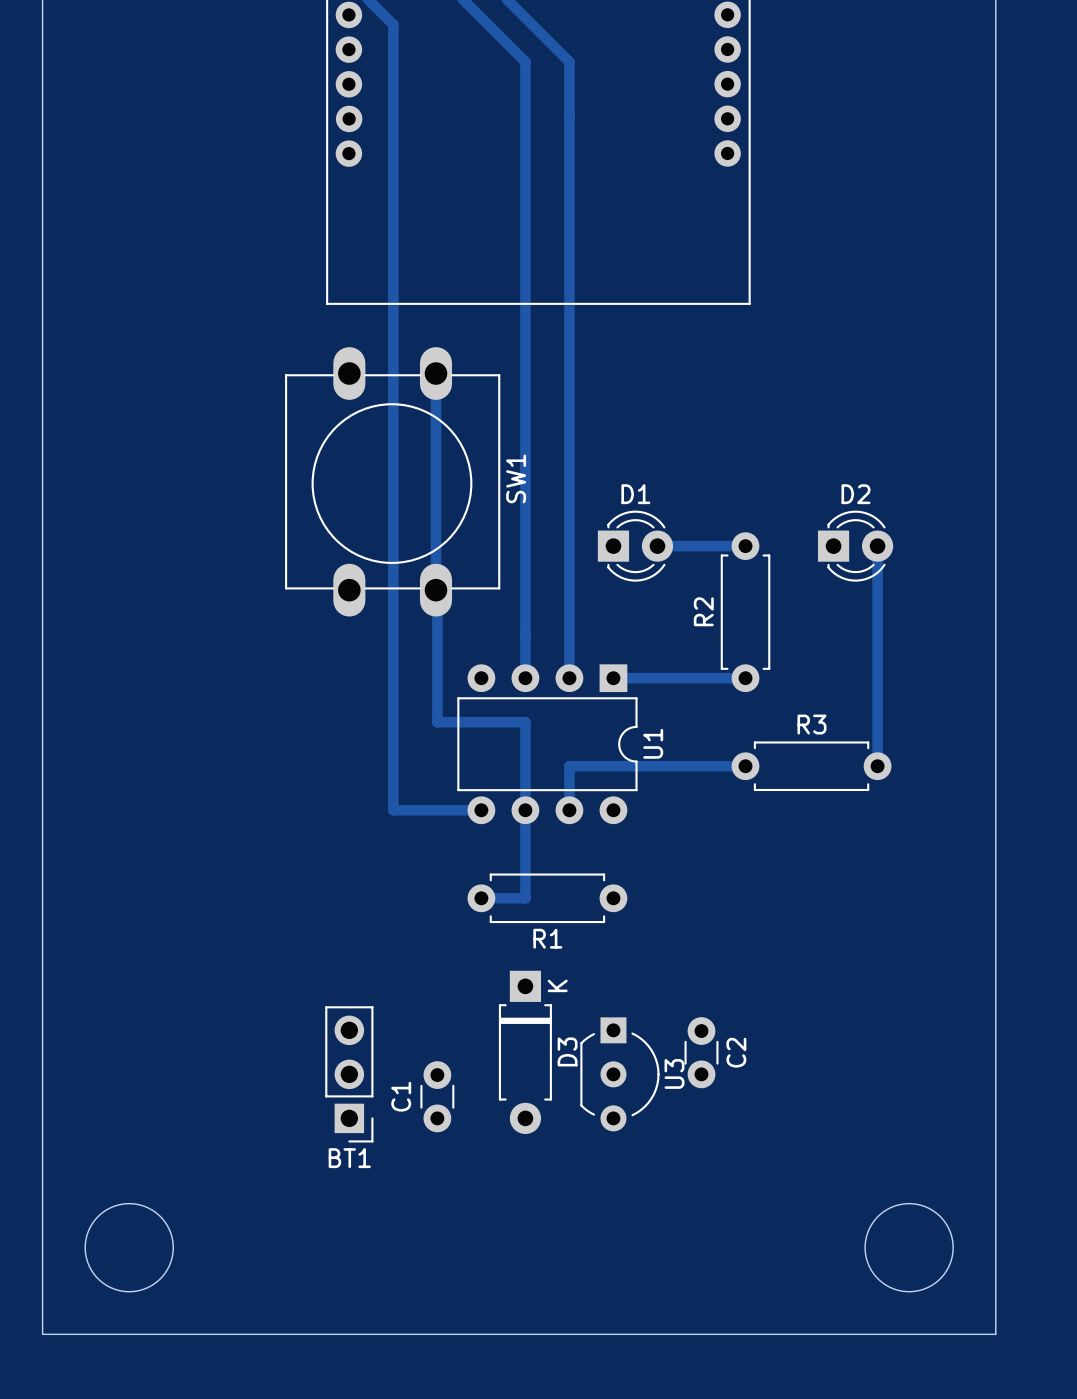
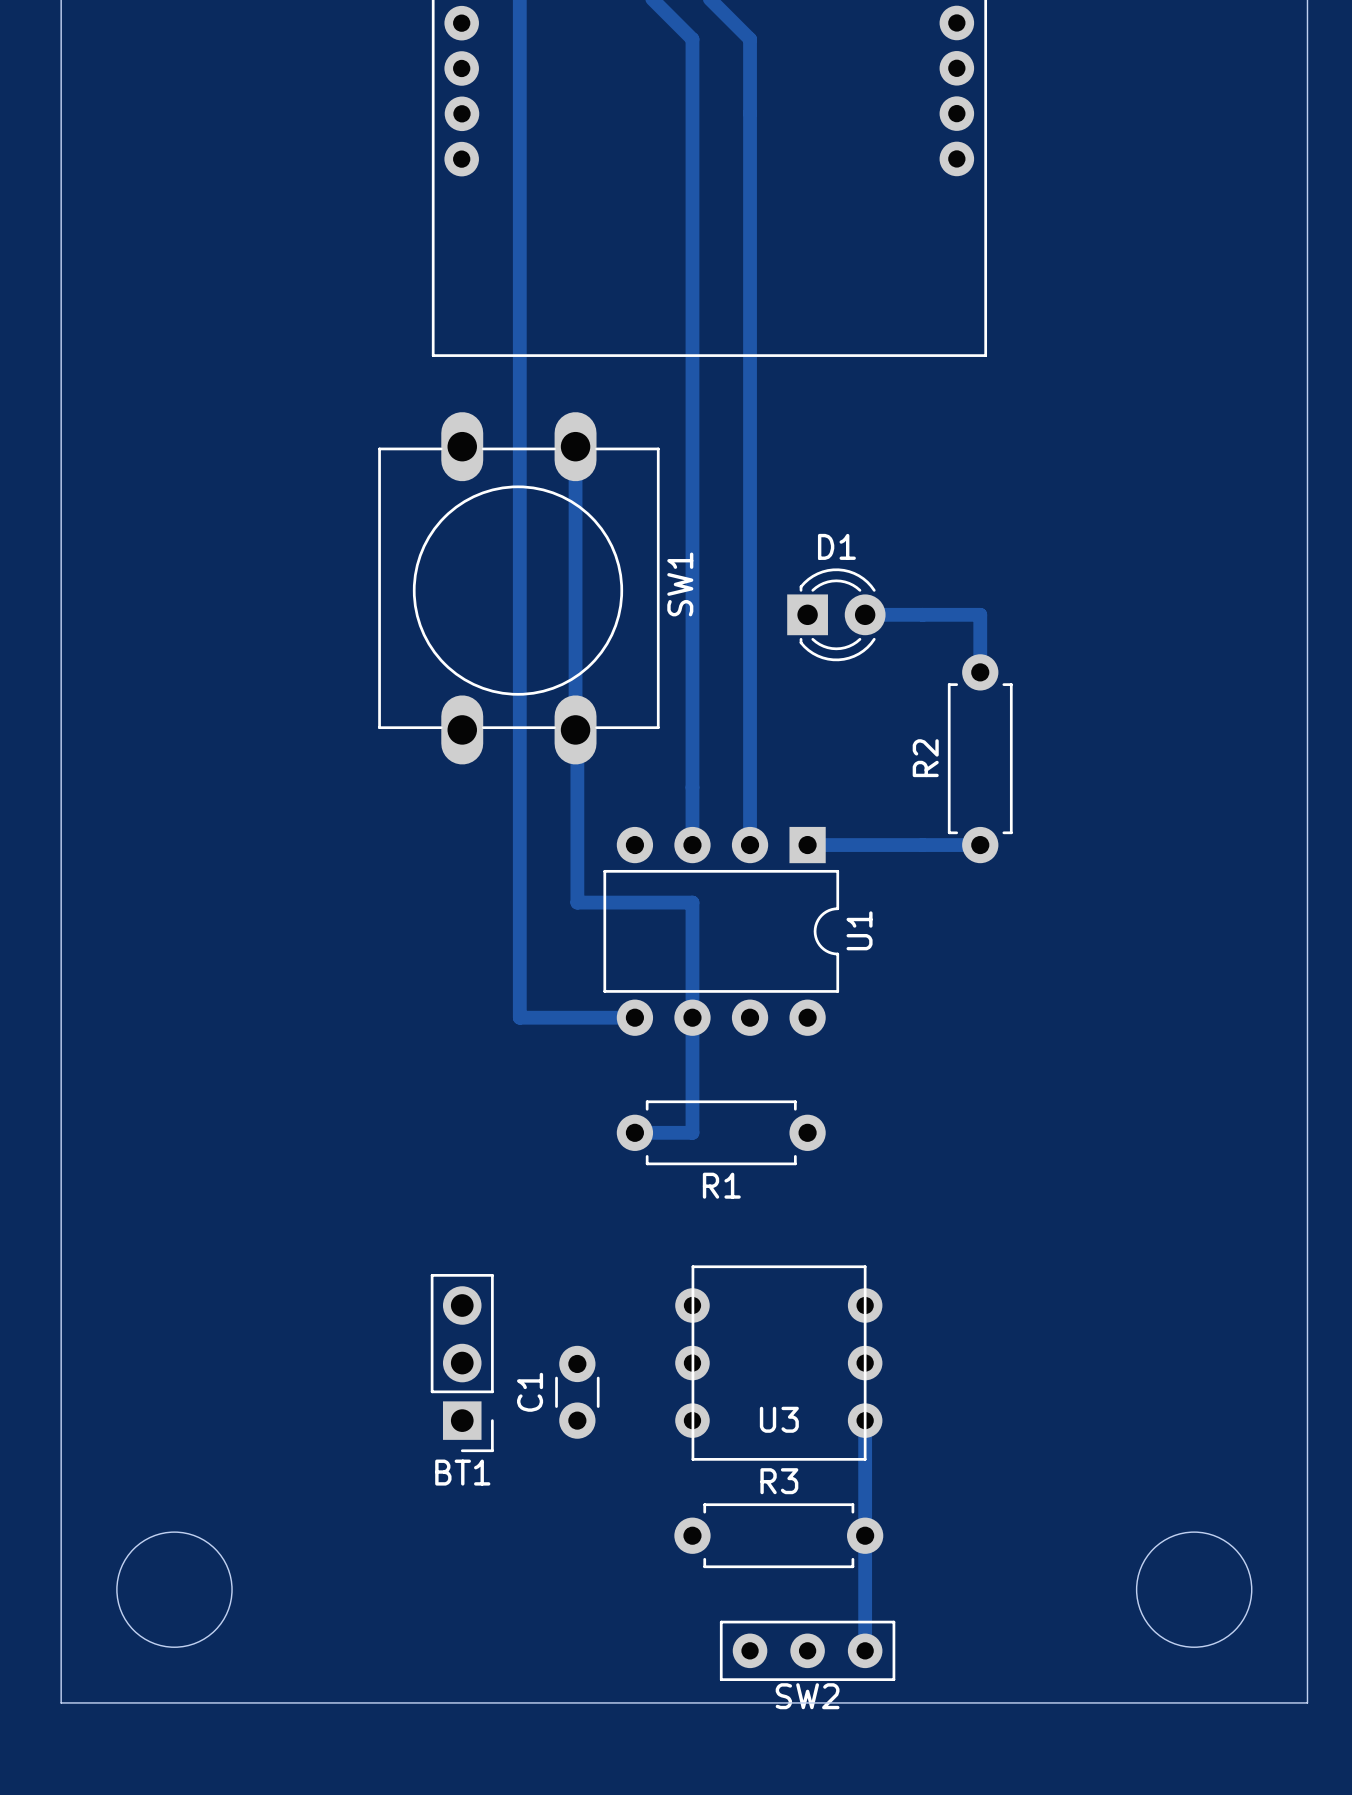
D1 position: (635, 546) -> (836, 614)
track: (657, 546) (745, 546) -> (865, 614) (980, 614) (980, 672)
D2: (855, 546) -> none
track: (877, 546) (877, 766) -> none
track: (745, 766) (569, 766) (569, 810) -> none
R3 position: (811, 766) -> (778, 1535)
U3 footprint: [580, 1017, 660, 1132] -> [675, 1265, 883, 1461]
D3: (525, 1052) -> none
C2: (701, 1052) -> none
U3 name position: U3 (674, 1073) -> U3 (779, 1419)
track: none -> (865, 1420) (865, 1650)
SW2: none -> (807, 1650)

